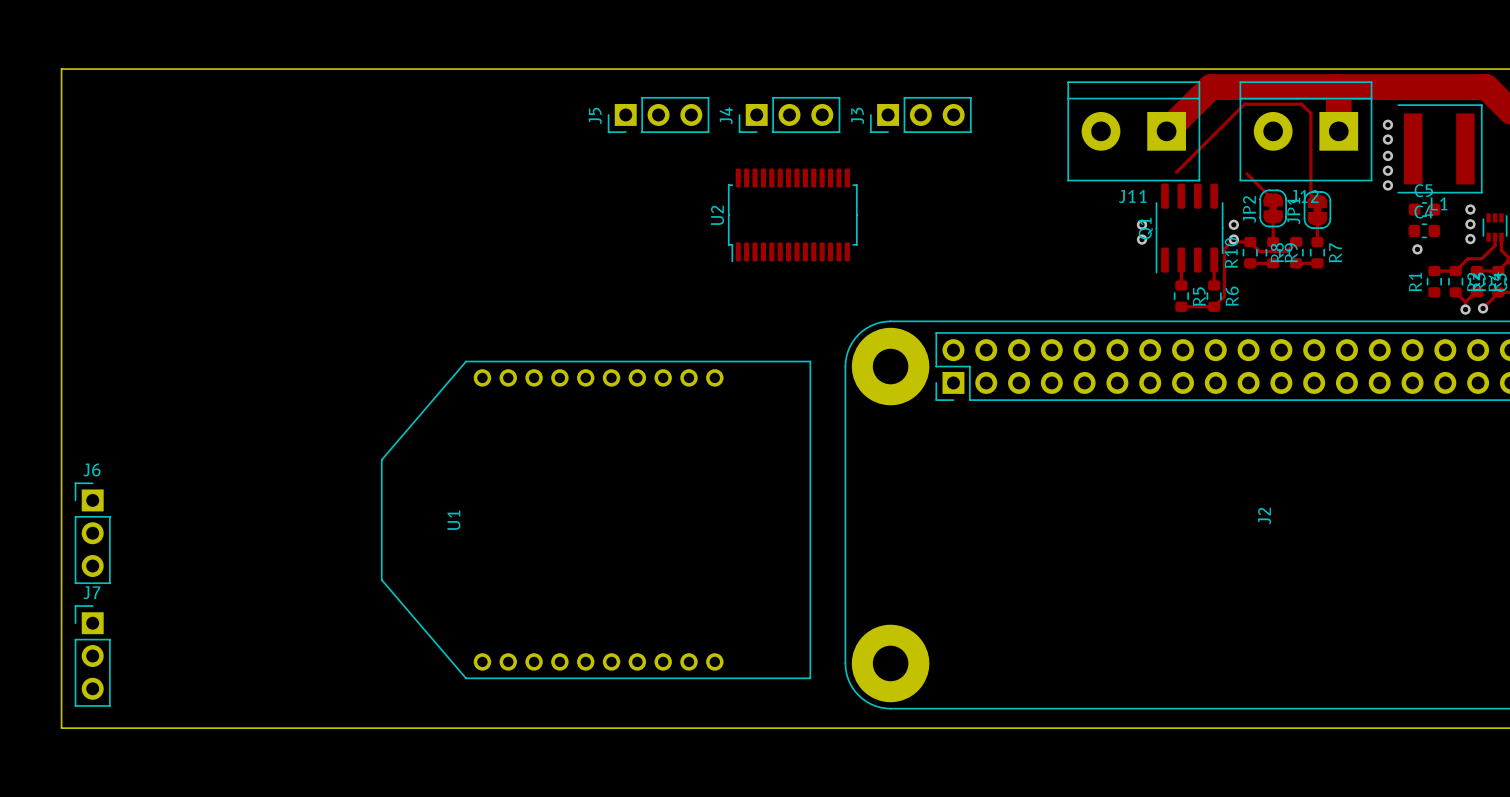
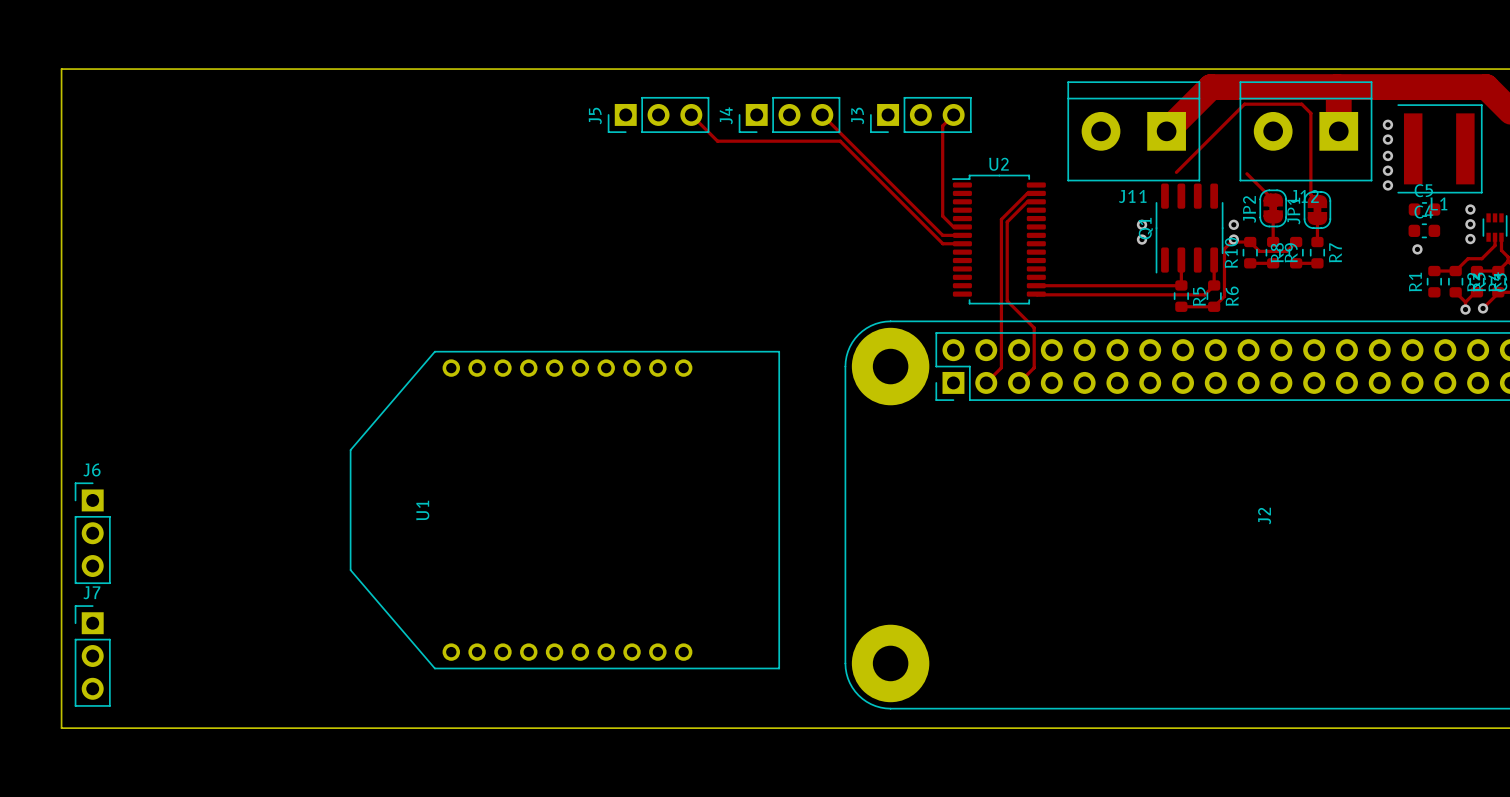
track: none -> (691, 114) (717, 141) (840, 141) (942, 243) (962, 243)
track: none -> (822, 114) (942, 235) (962, 235)
track: none -> (953, 114) (942, 125) (942, 216) (953, 226) (962, 226)
track: none -> (1036, 193) (1027, 193) (1001, 219) (1001, 367) (986, 382)
track: none -> (1036, 201) (1027, 201) (1007, 222) (1007, 300) (1034, 327) (1034, 367) (1019, 382)
U2 rotation: 0° (792, 215) -> 90° clockwise (998, 239)
U2 position: (792, 215) -> (998, 239)
track: none -> (1181, 285) (1036, 285)
track: none -> (1214, 285) (1204, 294) (1036, 294)
U1 position: (596, 519) -> (564, 510)

